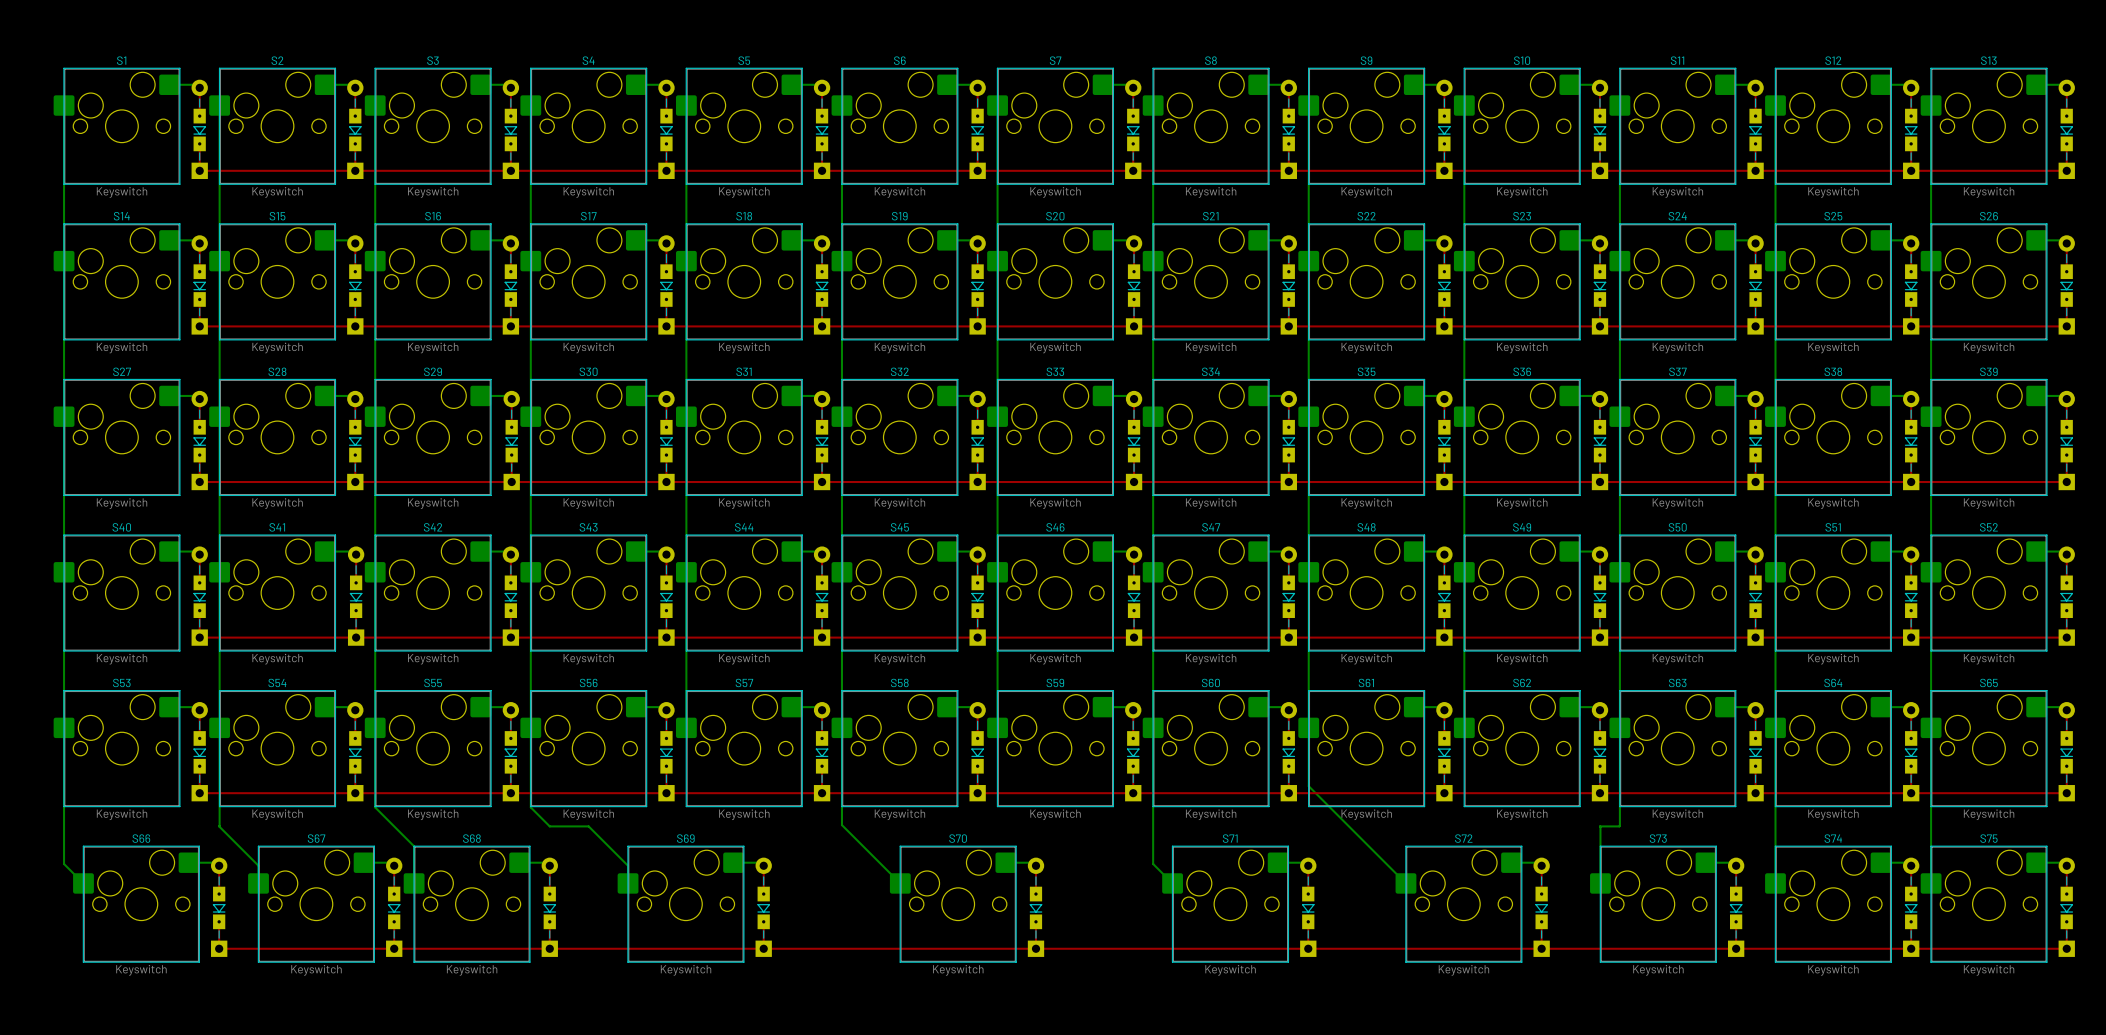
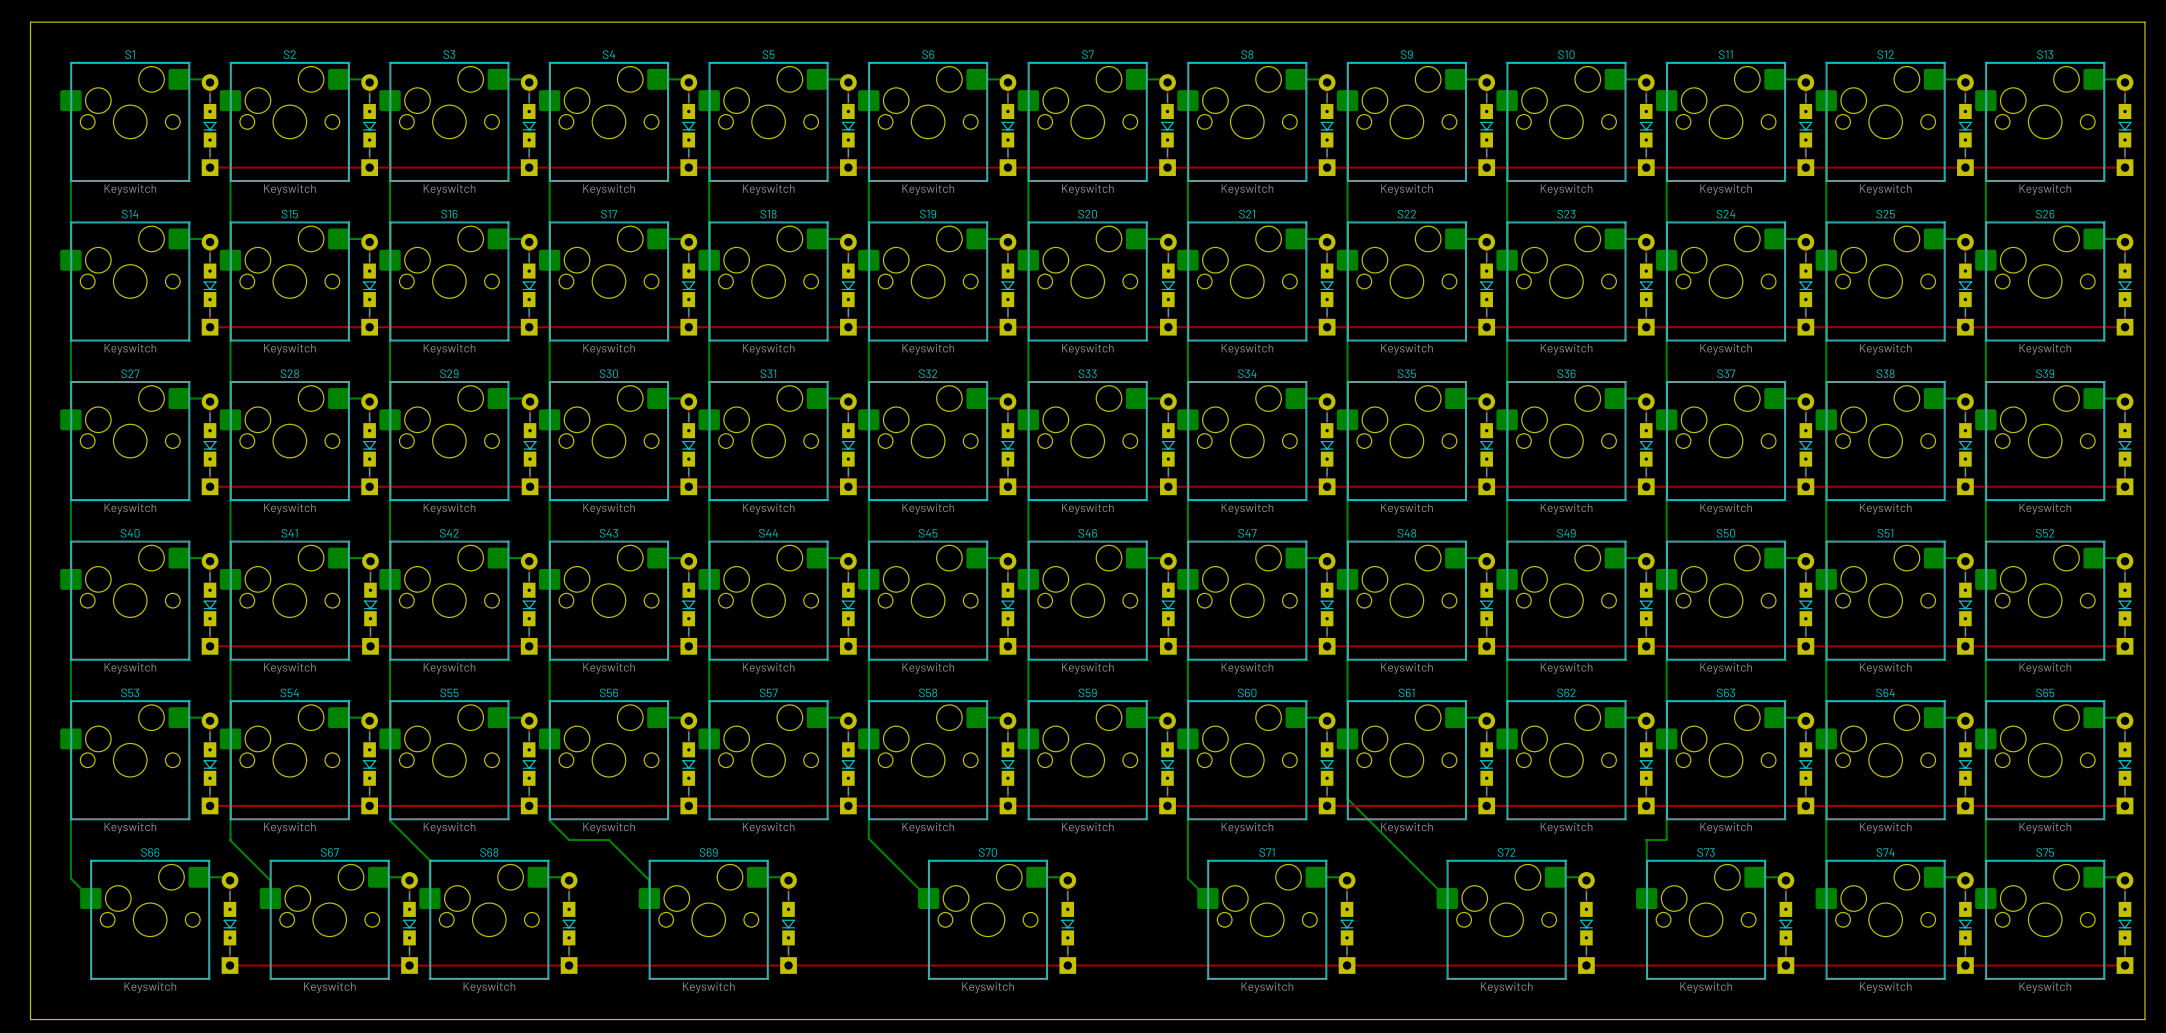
board edge: none -> (30, 22) (2144, 22) (2144, 1019) (30, 1019) (30, 22)

